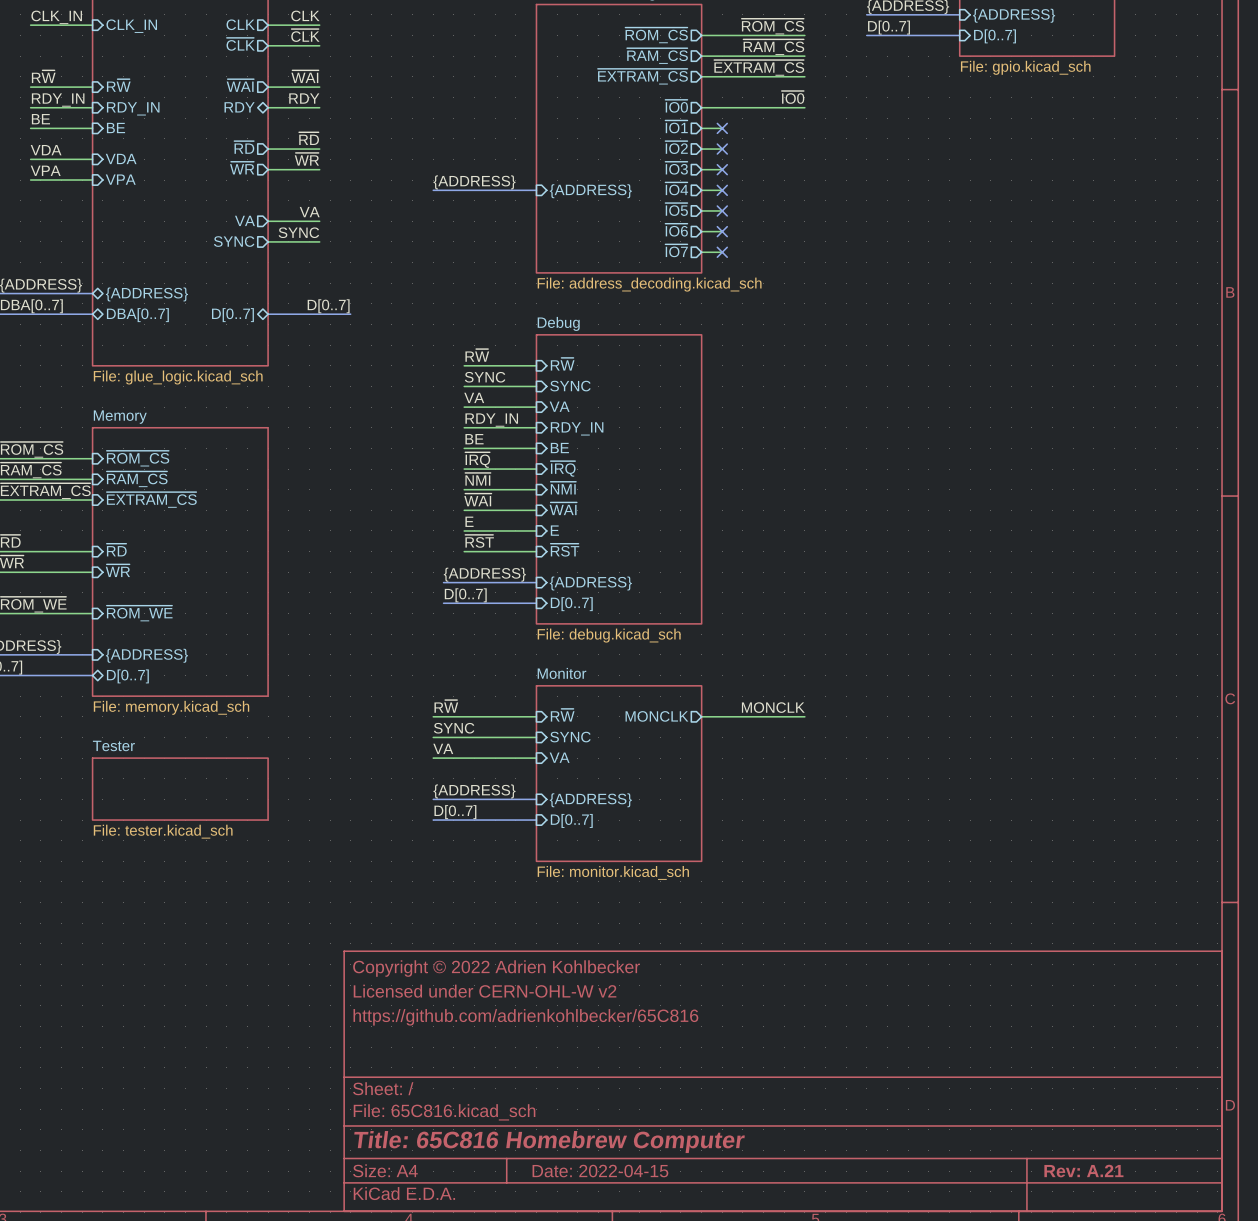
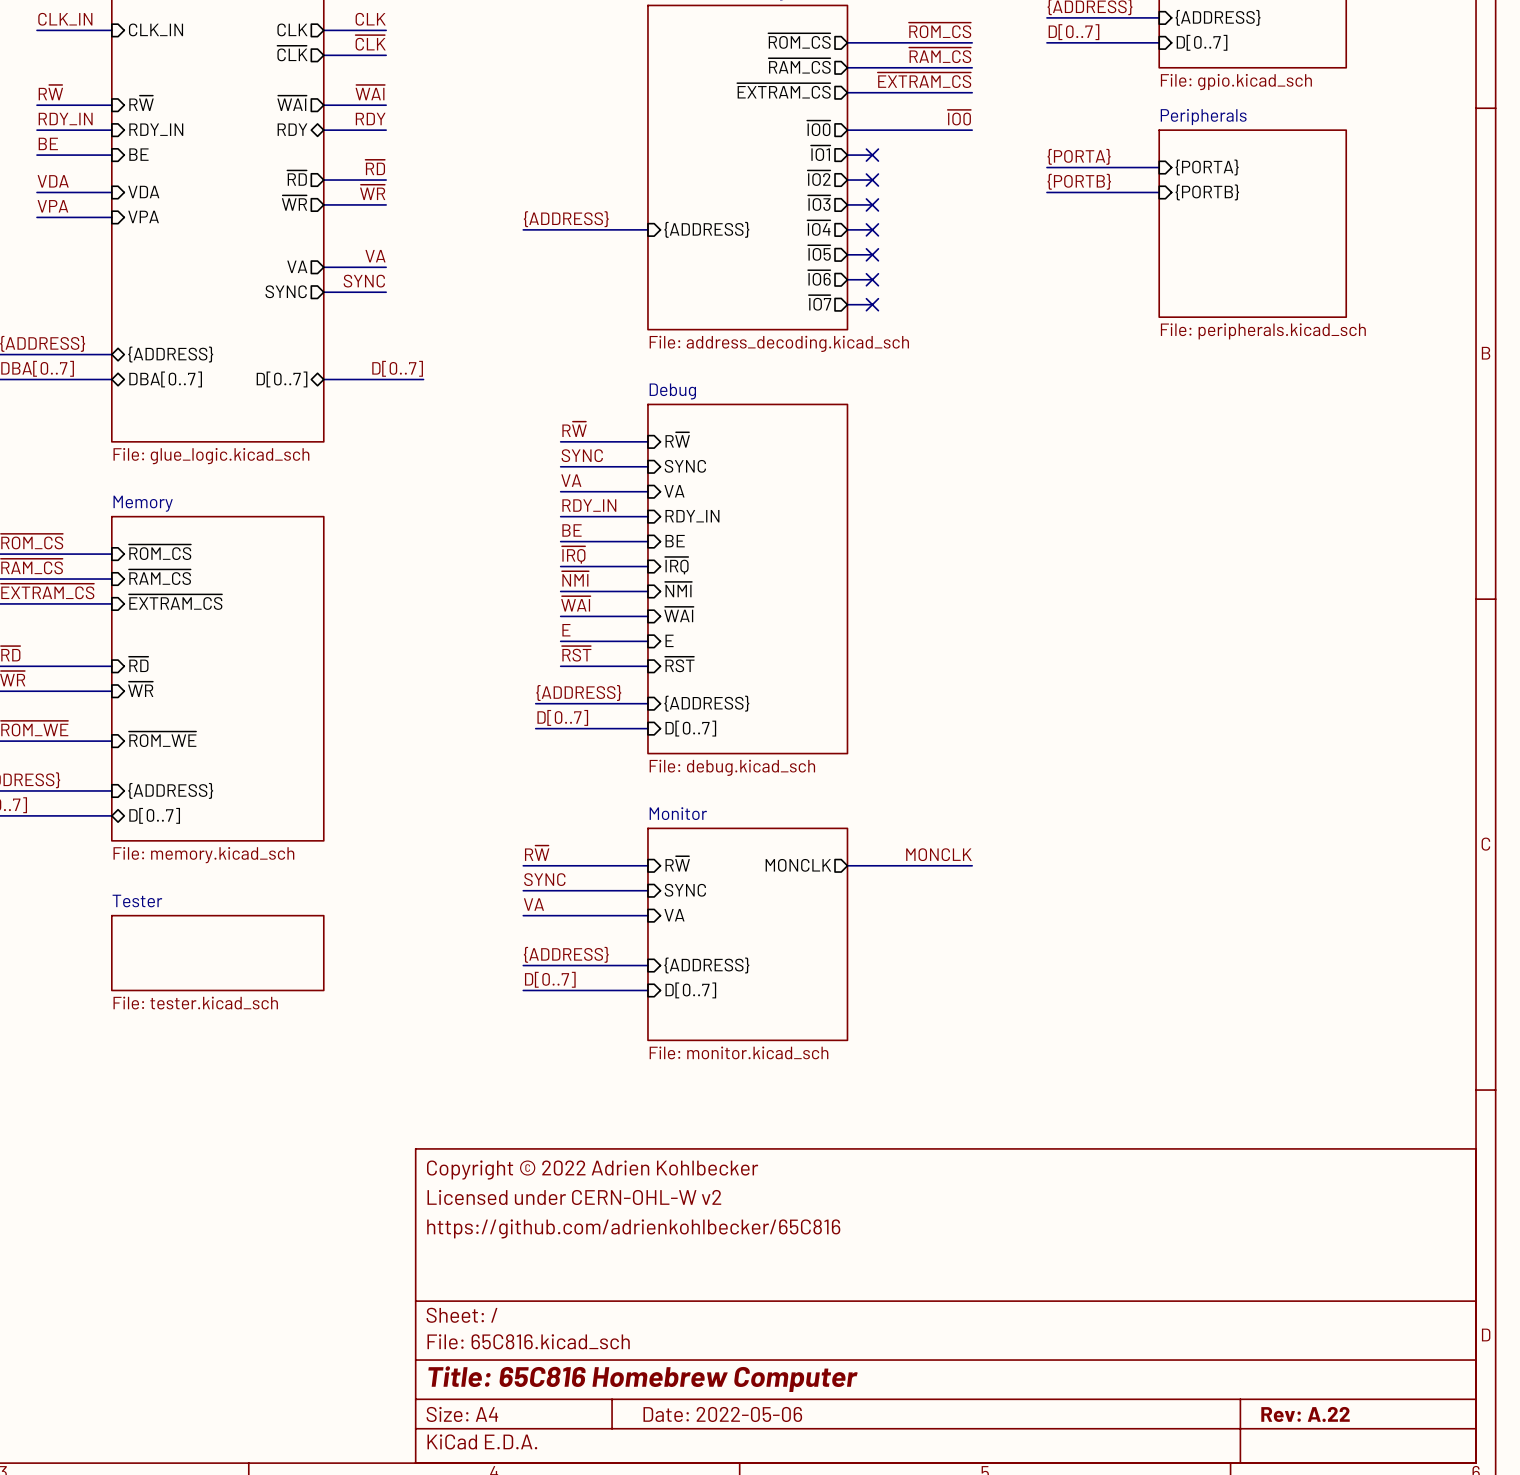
label: none -> {PORTA} (1079, 156)
bus: none -> (1046, 167) (1159, 167)
sheet pin: none -> {PORTA} (1207, 167)
label: none -> {PORTB} (1079, 181)
bus: none -> (1046, 192) (1159, 192)
sheet pin: none -> {PORTB} (1207, 192)
sheet Peripherals: none -> File: peripherals.kicad_sch (1252, 223)
title block: Date: 2022-04-15 (600, 1171) -> Date: 2022-05-06 (722, 1414)
title block: Rev: A.21 (1083, 1171) -> Rev: A.22 (1305, 1414)

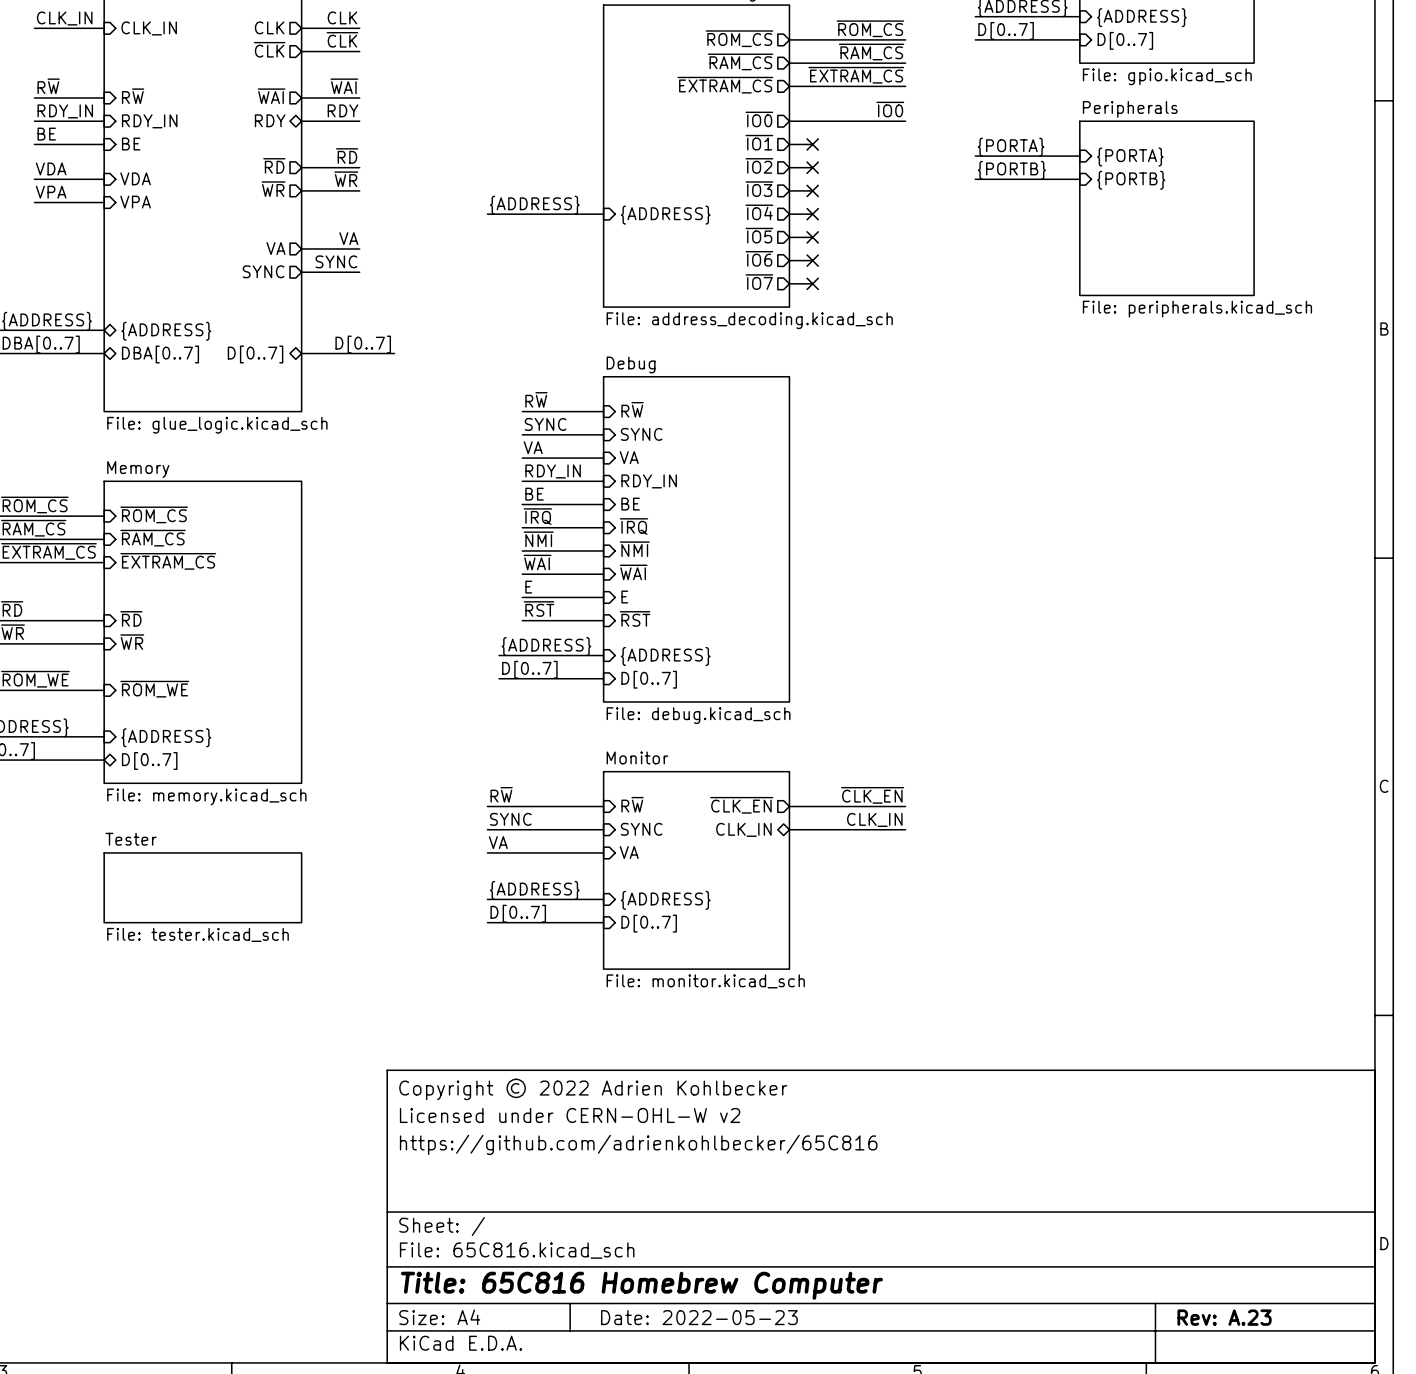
label: MONCLK (938, 854) -> ~{CLK_EN} (872, 795)
sheet pin: MONCLK (798, 865) -> ~{CLK_EN} (741, 805)
label: none -> CLK_IN (874, 819)
sheet pin: none -> CLK_IN (743, 829)
wire: none -> (789, 829) (905, 829)
title block: Date: 2022-05-06 (722, 1414) -> Date: 2022-05-23 (699, 1317)
title block: Rev: A.22 (1305, 1414) -> Rev: A.23 (1224, 1317)

